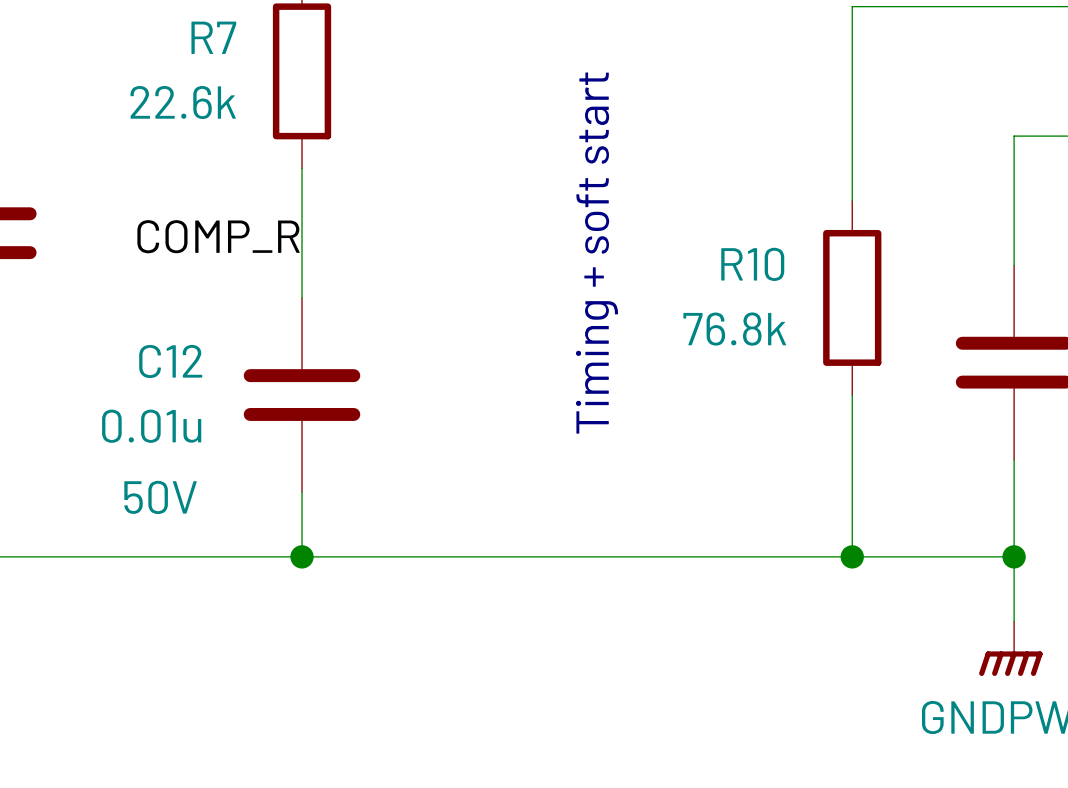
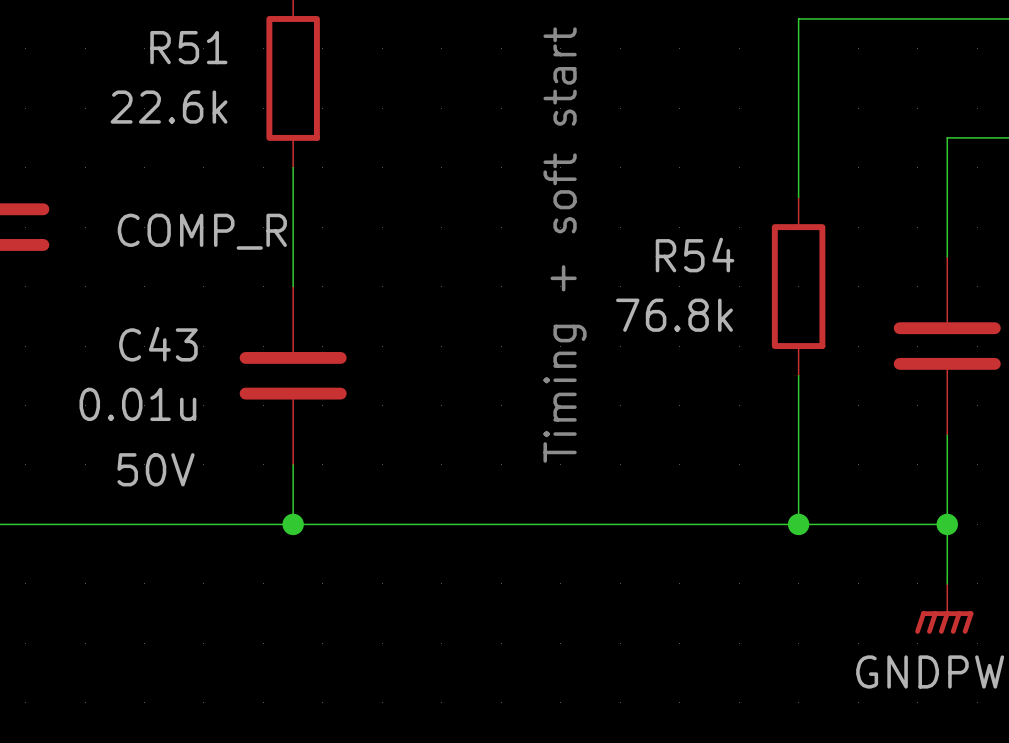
R7 name: R7 (213, 37) -> R51 (188, 47)
R10 name: R10 (752, 264) -> R54 (695, 255)
C12 name: C12 (170, 361) -> C43 (158, 344)

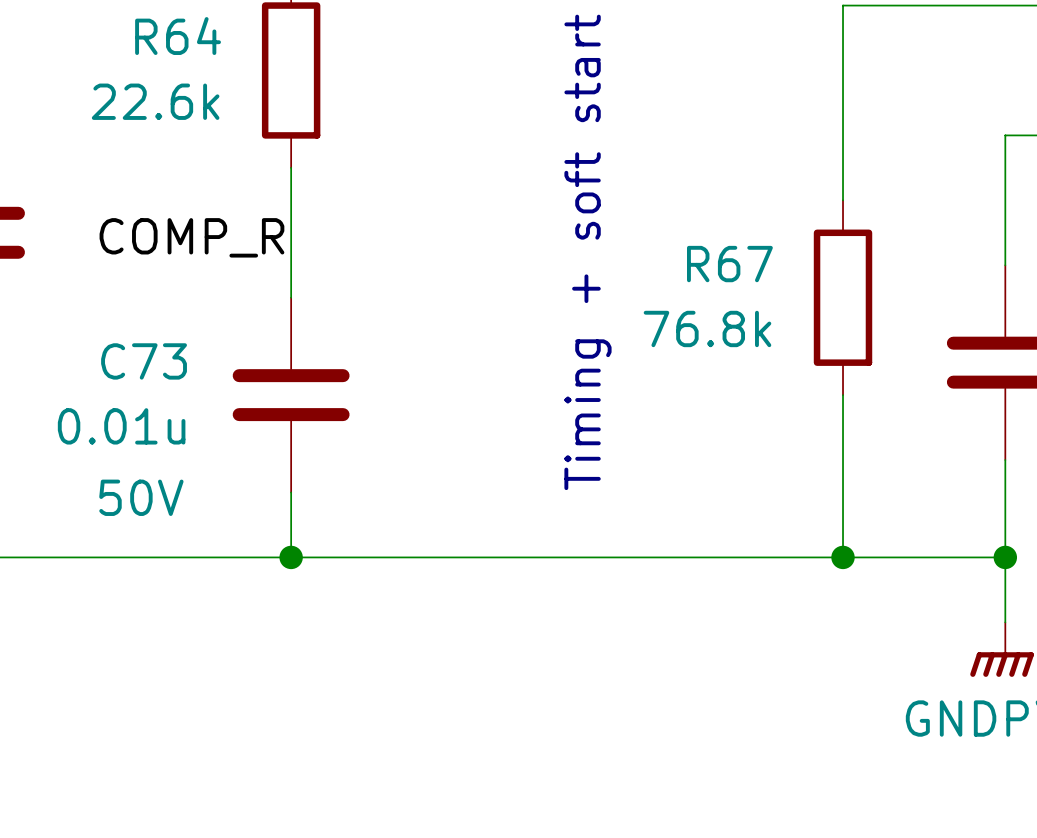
R51 name: R51 (188, 47) -> R64 (178, 36)
R54 name: R54 (695, 255) -> R67 (729, 264)
C43 name: C43 (158, 344) -> C73 (144, 361)

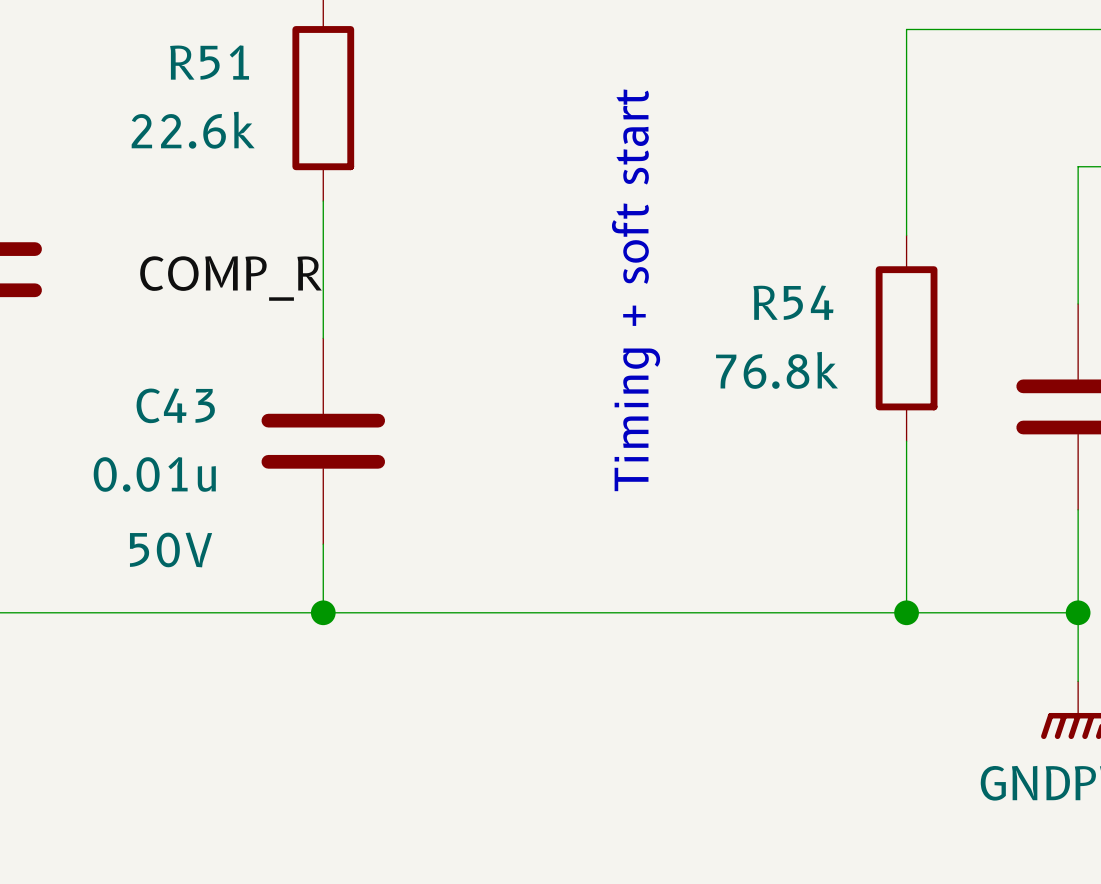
R64 name: R64 (178, 36) -> R51 (209, 62)
R67 name: R67 (729, 264) -> R54 (793, 302)
C73 name: C73 (144, 361) -> C43 (175, 405)

